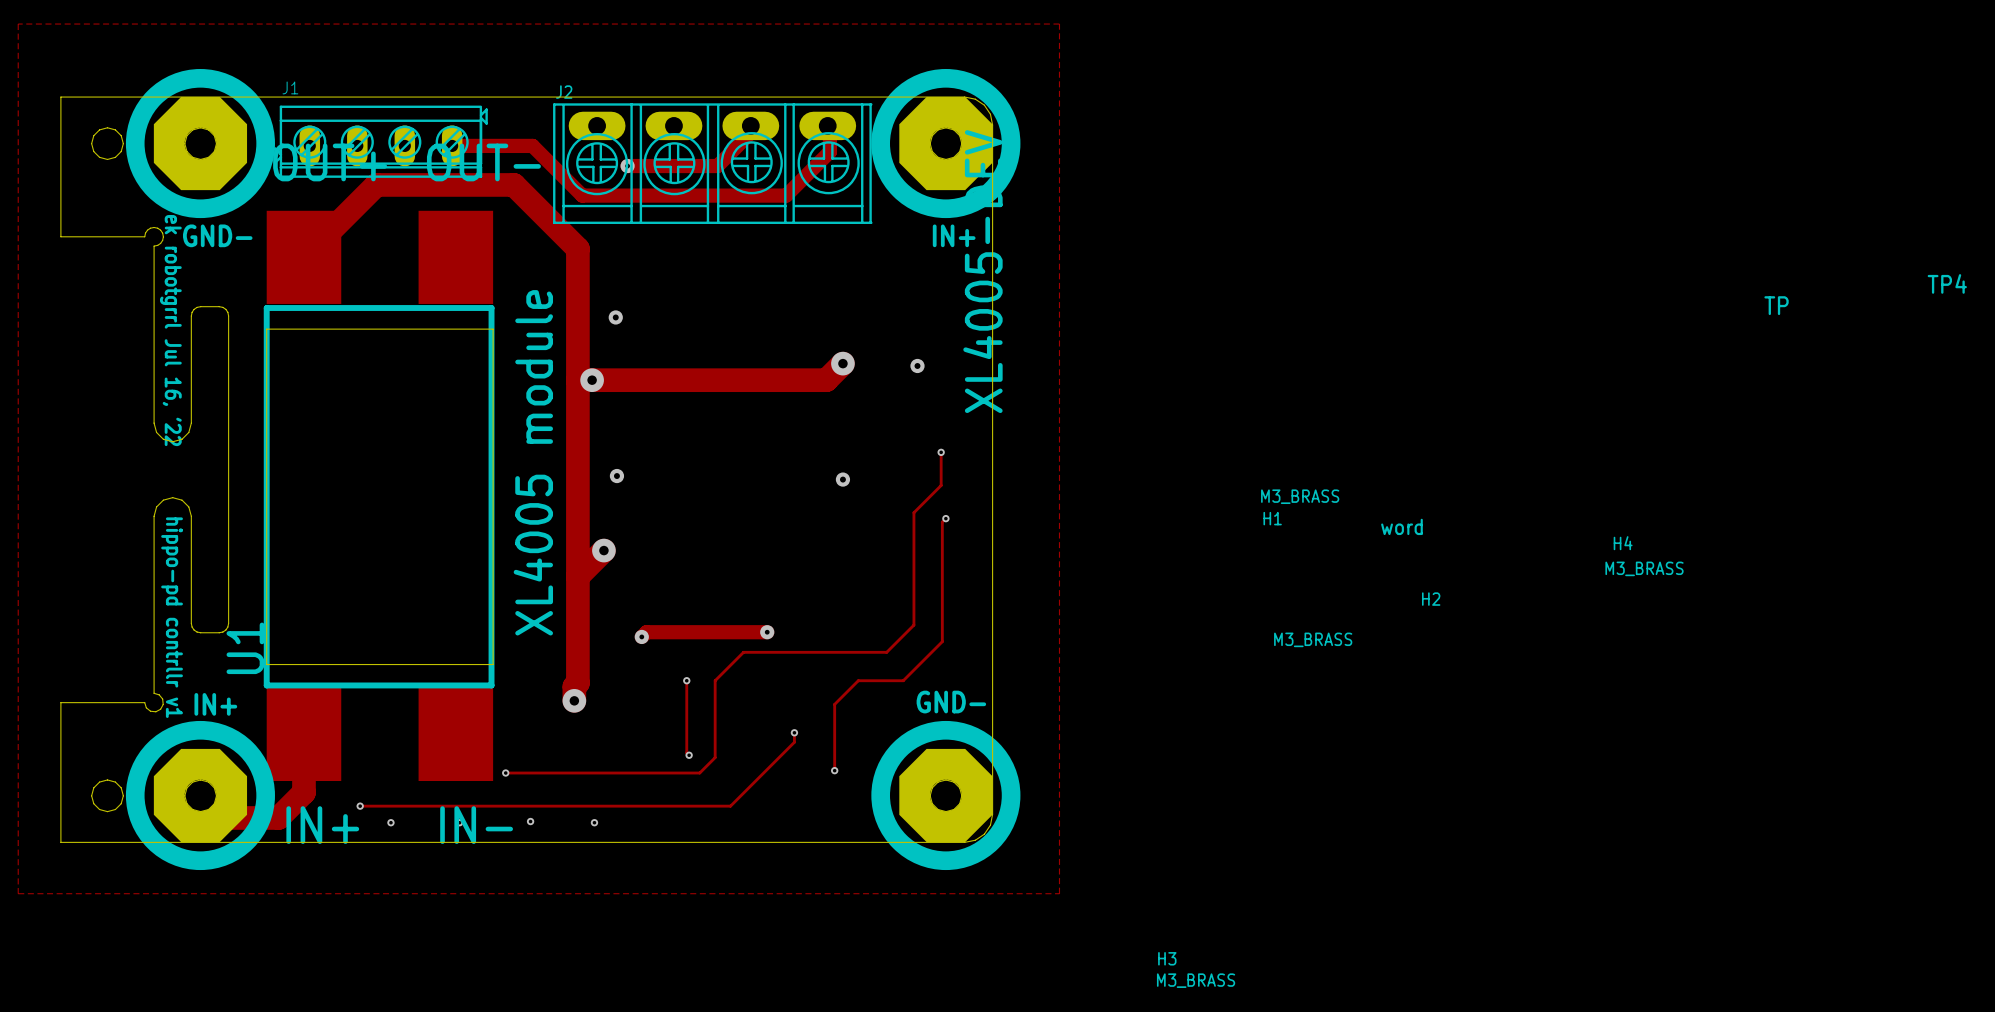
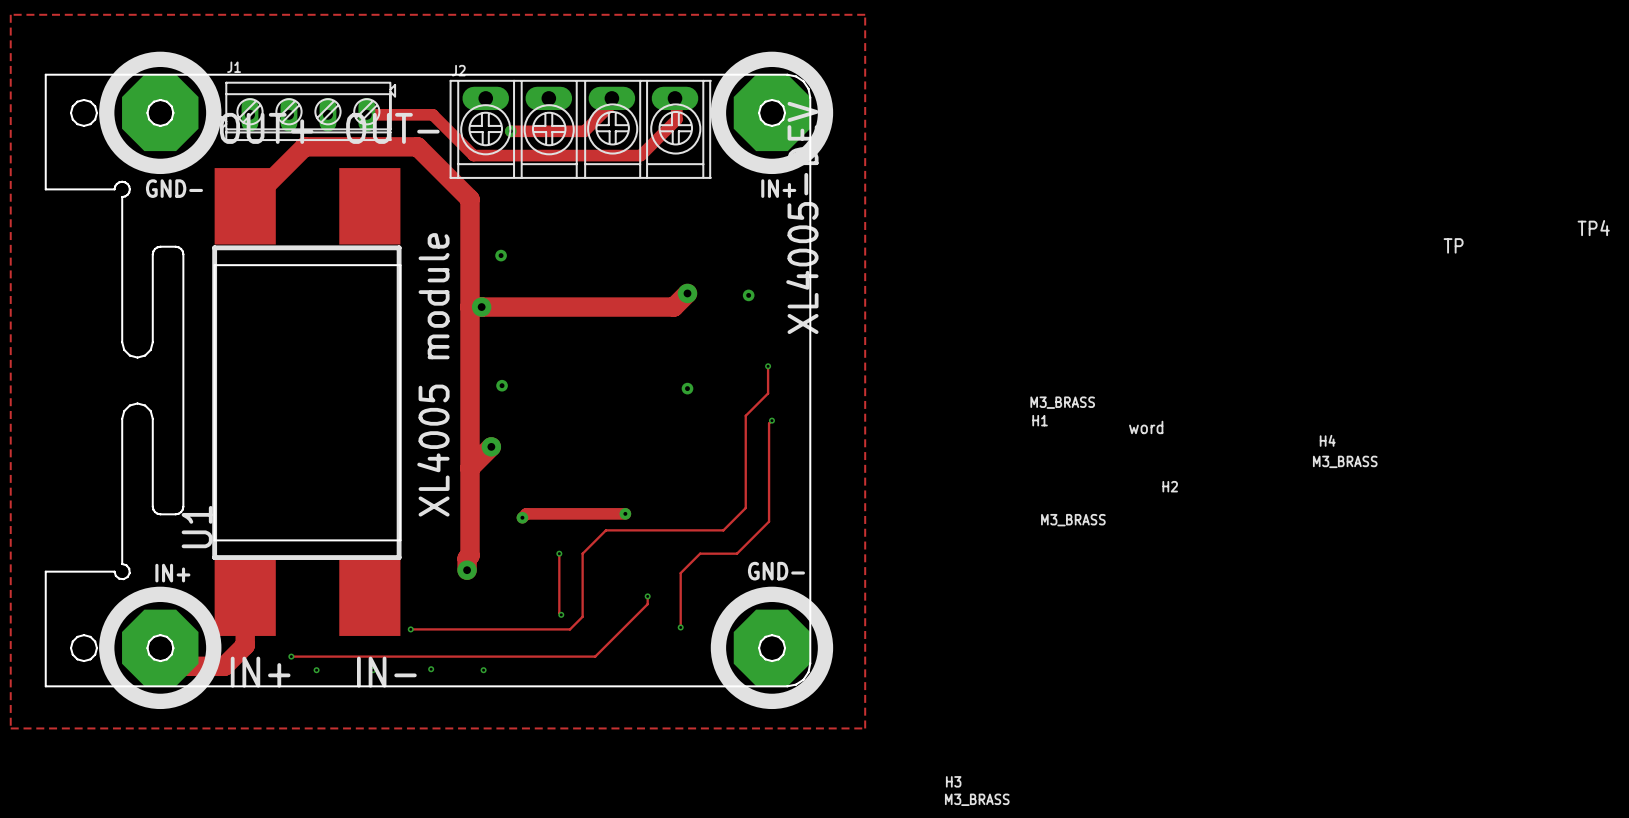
text: ek robotgrrl Jul 16, '22 (170, 330) -> none
text: hippo-pd contrllr v1 (172, 617) -> none

